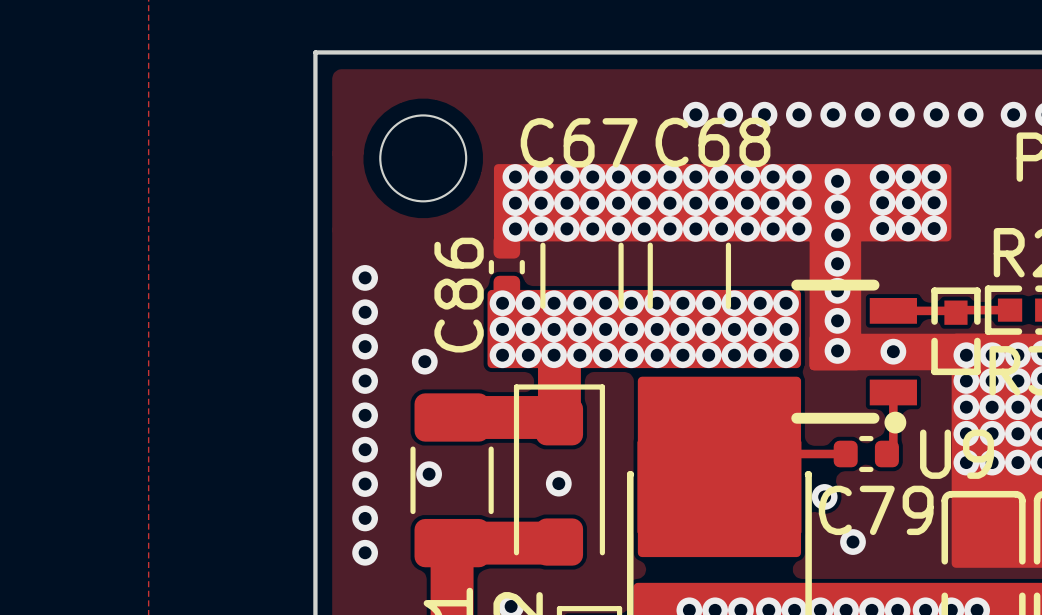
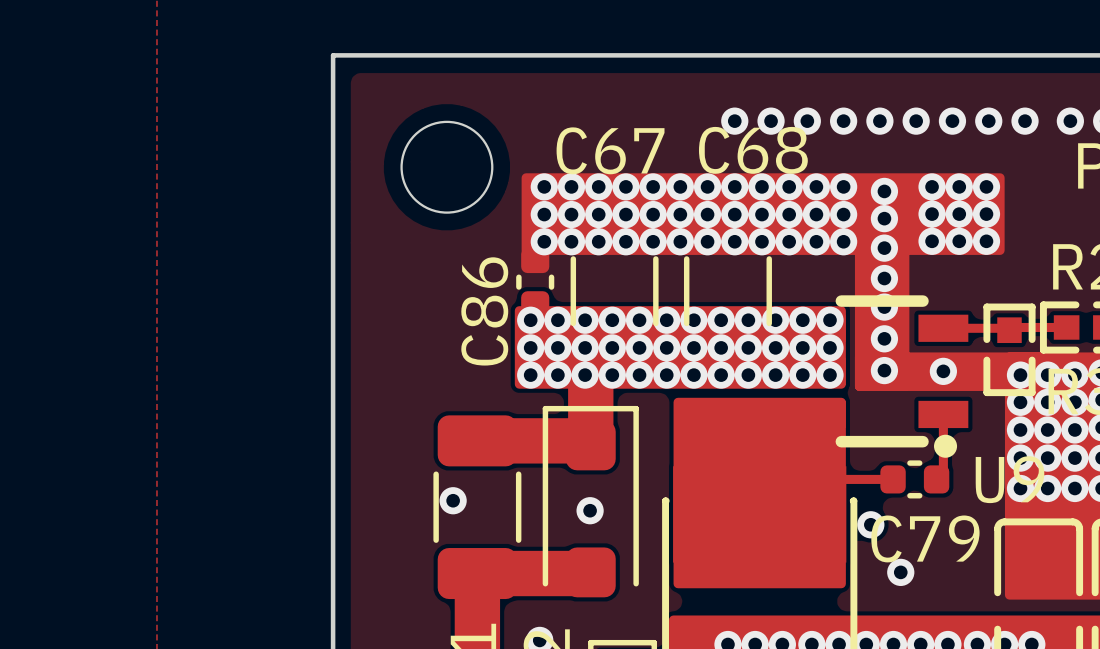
via: (365, 277) -> none
via: (365, 312) -> none
via: (365, 346) -> none
via: (424, 361) -> none
via: (365, 380) -> none
via: (365, 415) -> none
via: (365, 449) -> none
via: (365, 484) -> none
via: (365, 518) -> none
via: (365, 552) -> none

